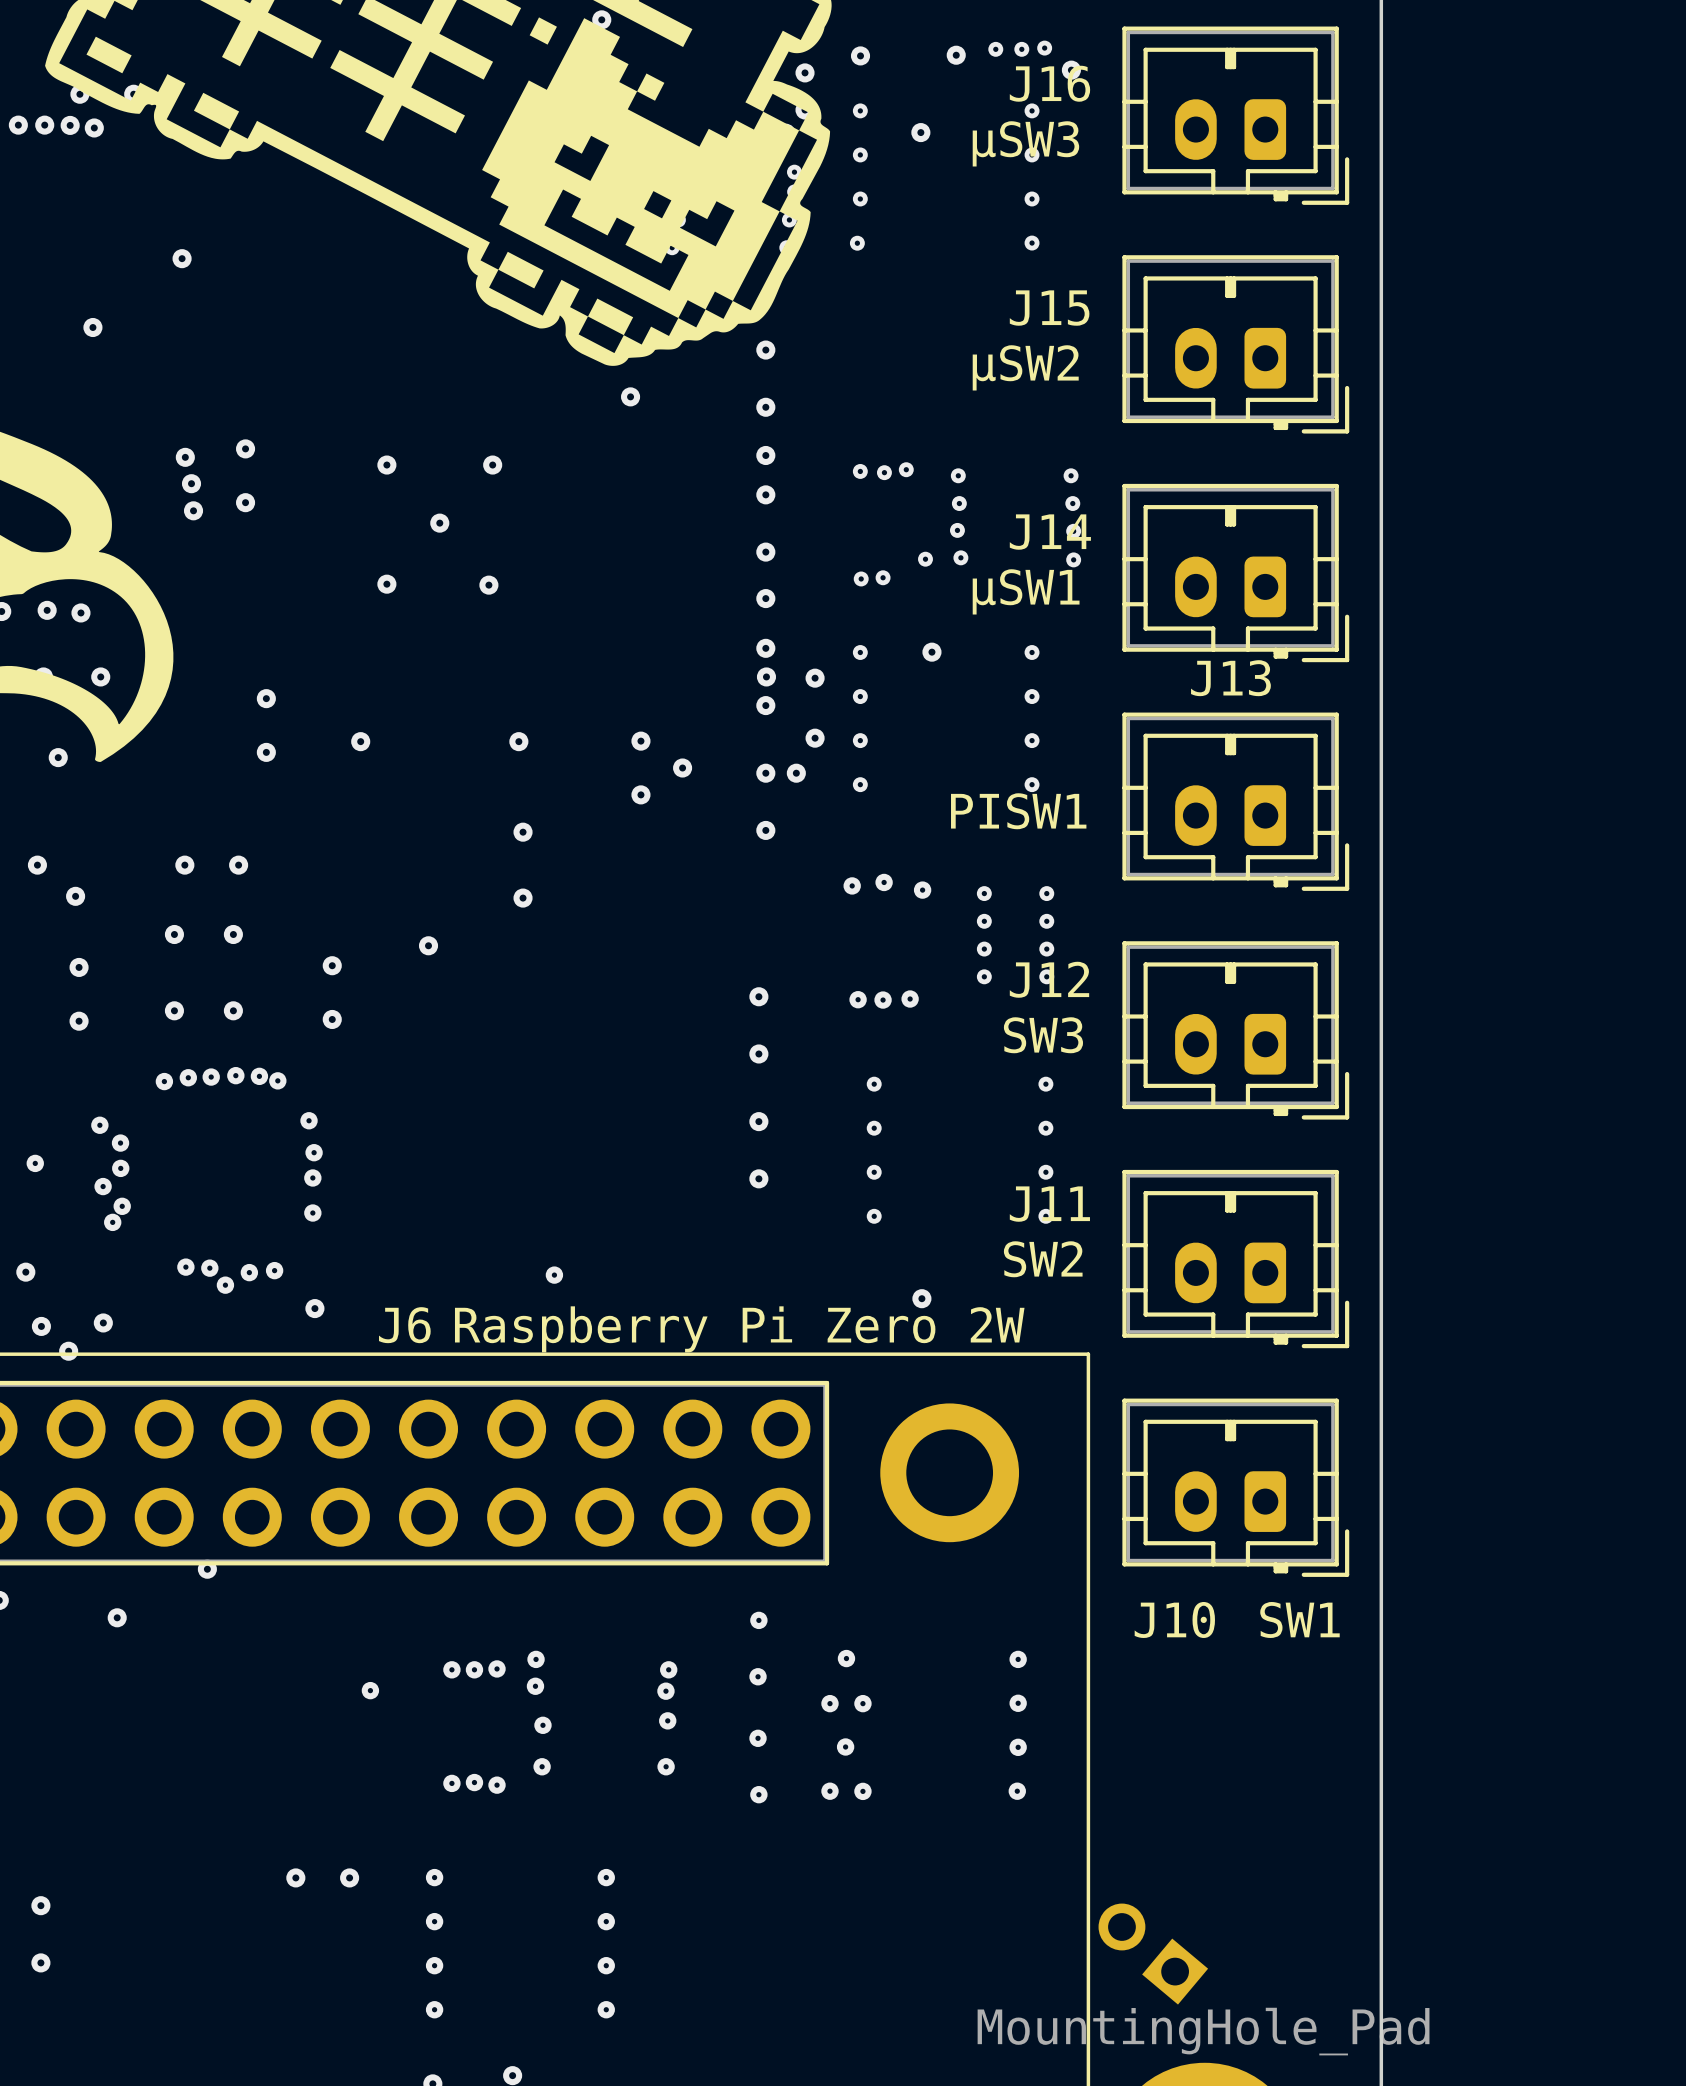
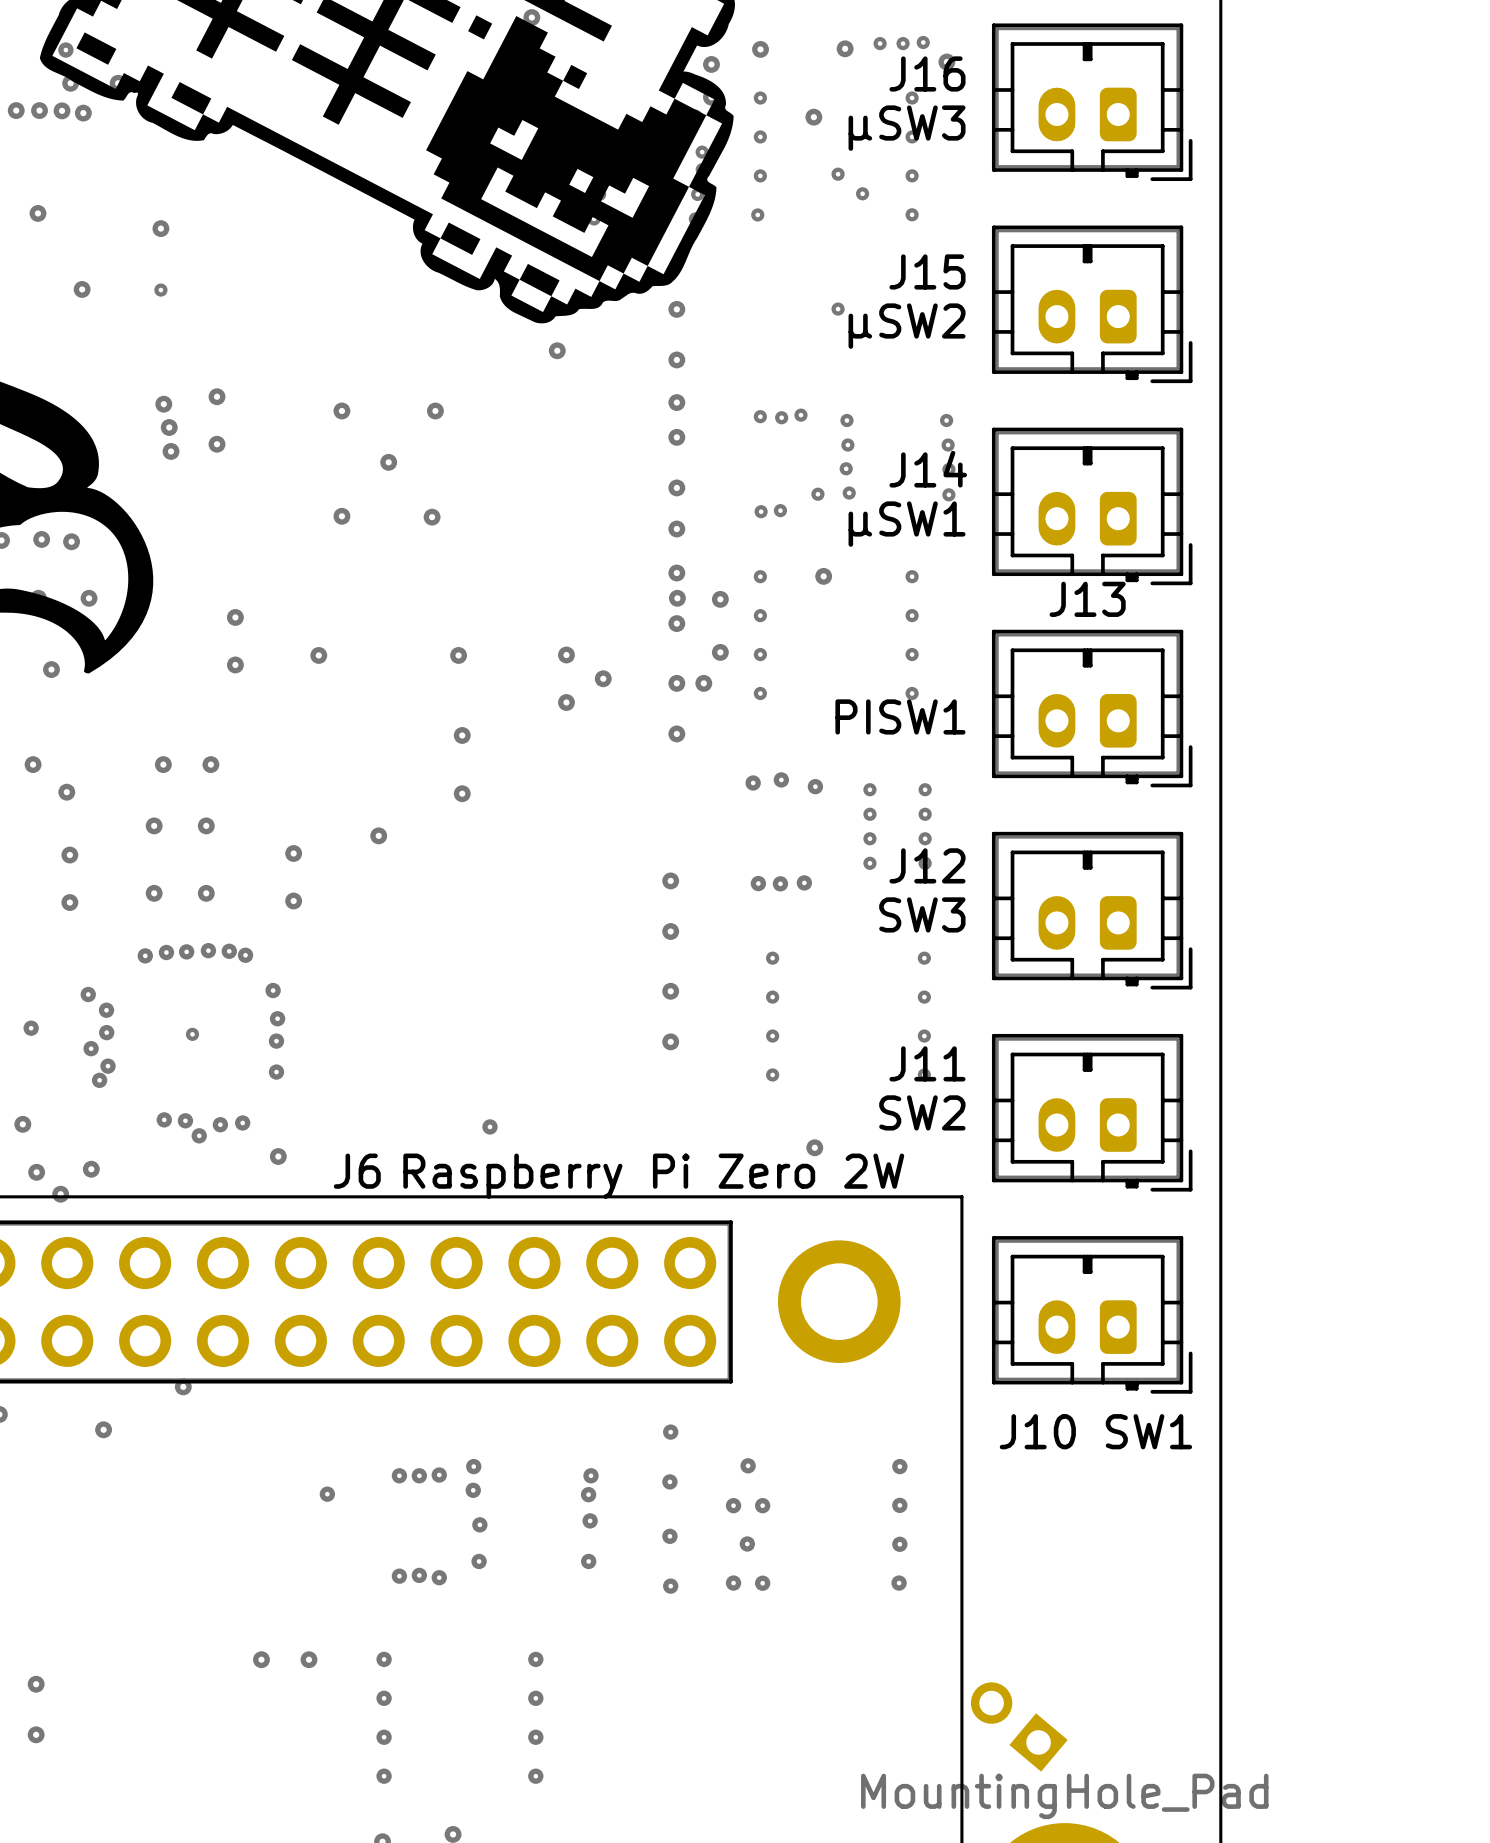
via: none -> (65, 50)
via: none -> (838, 174)
via: none -> (862, 193)
via: none -> (37, 213)
via: none -> (160, 290)
via: none -> (838, 309)
via: none -> (192, 1034)

